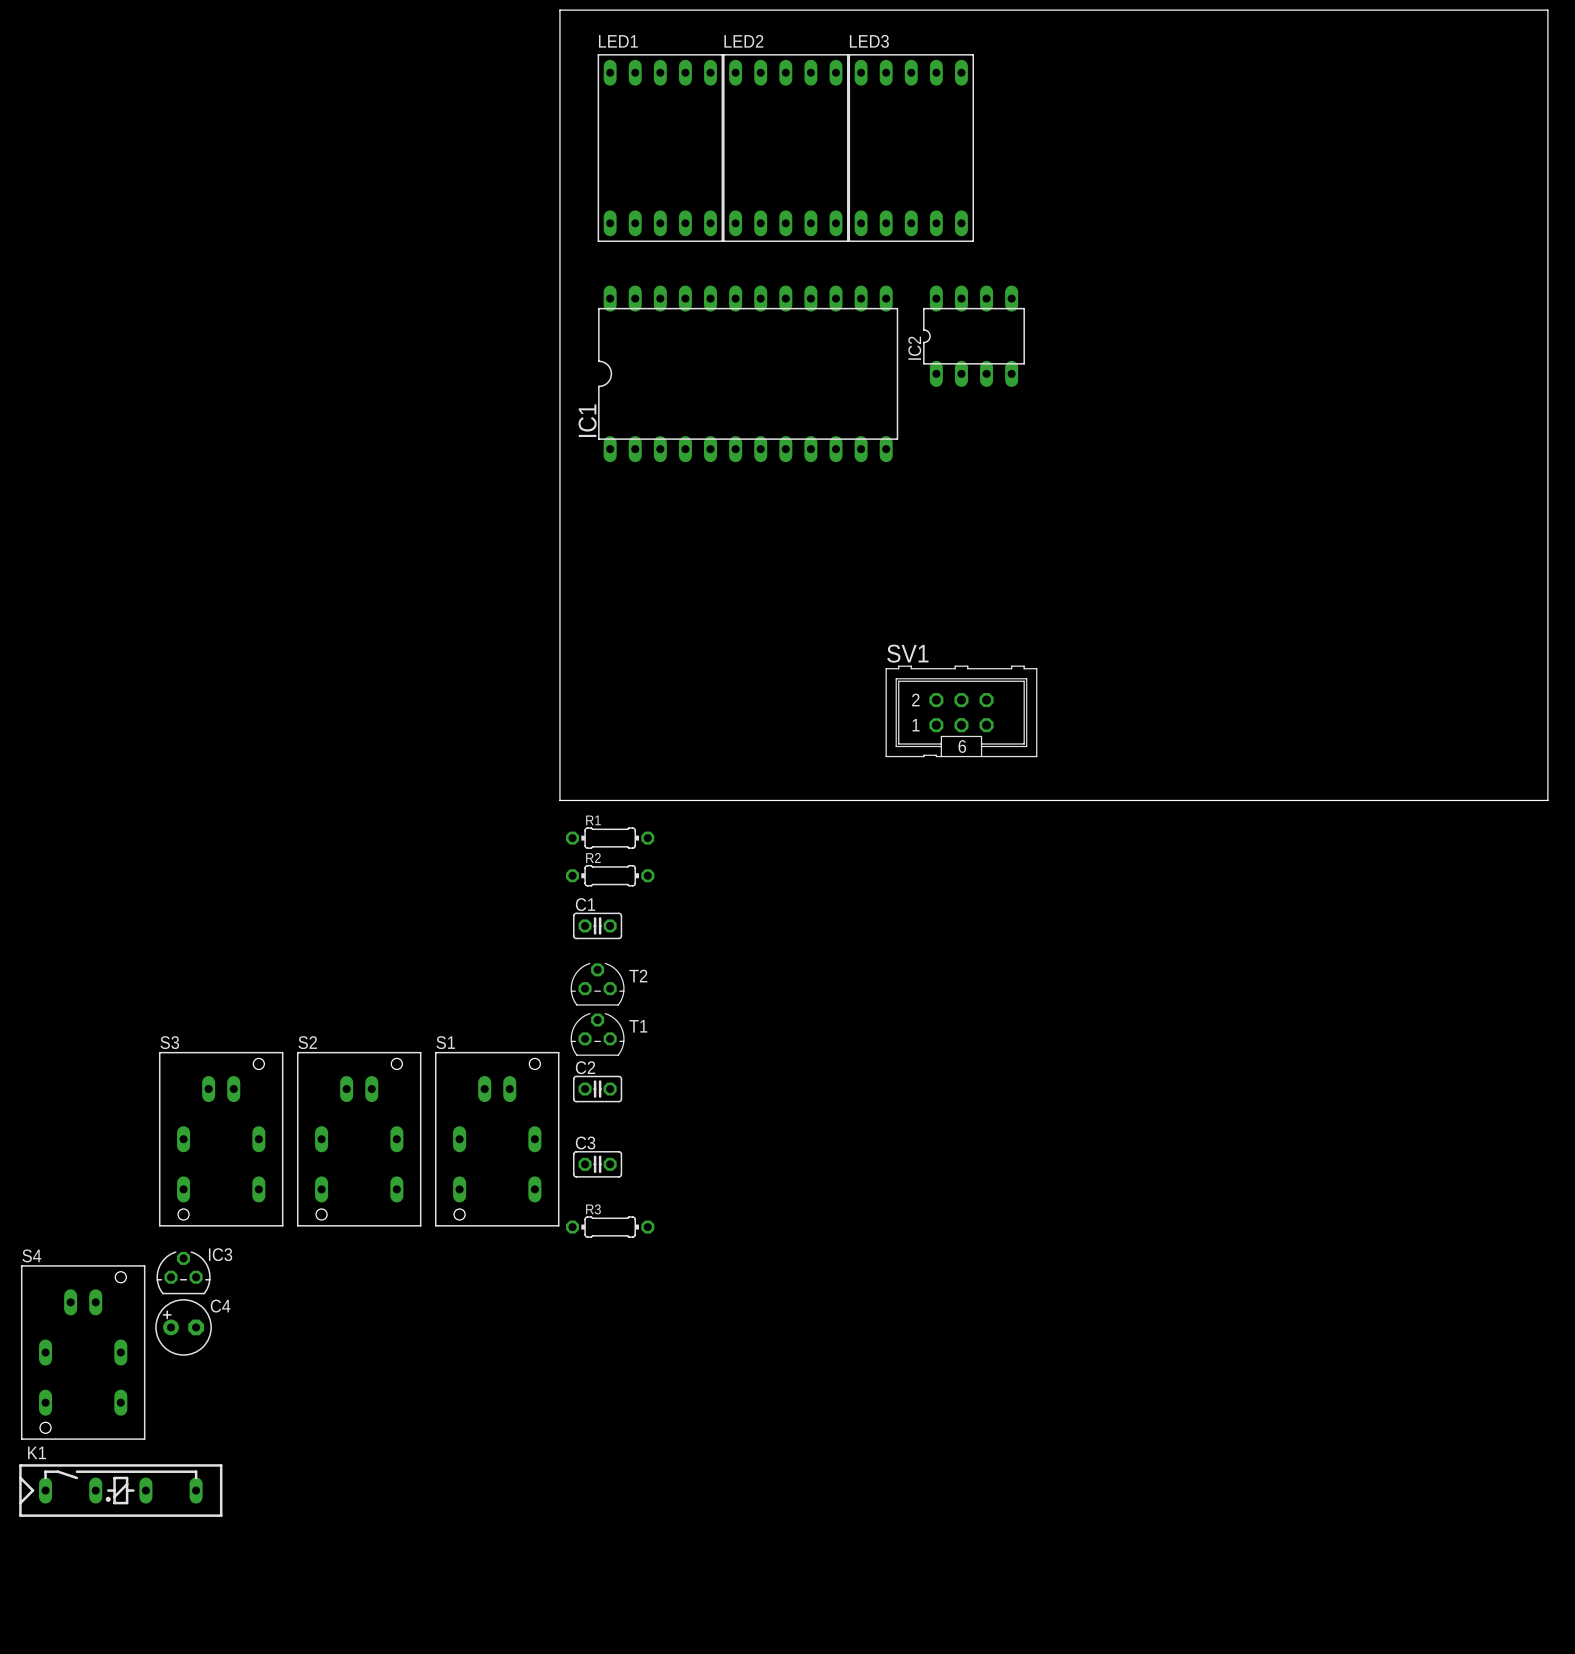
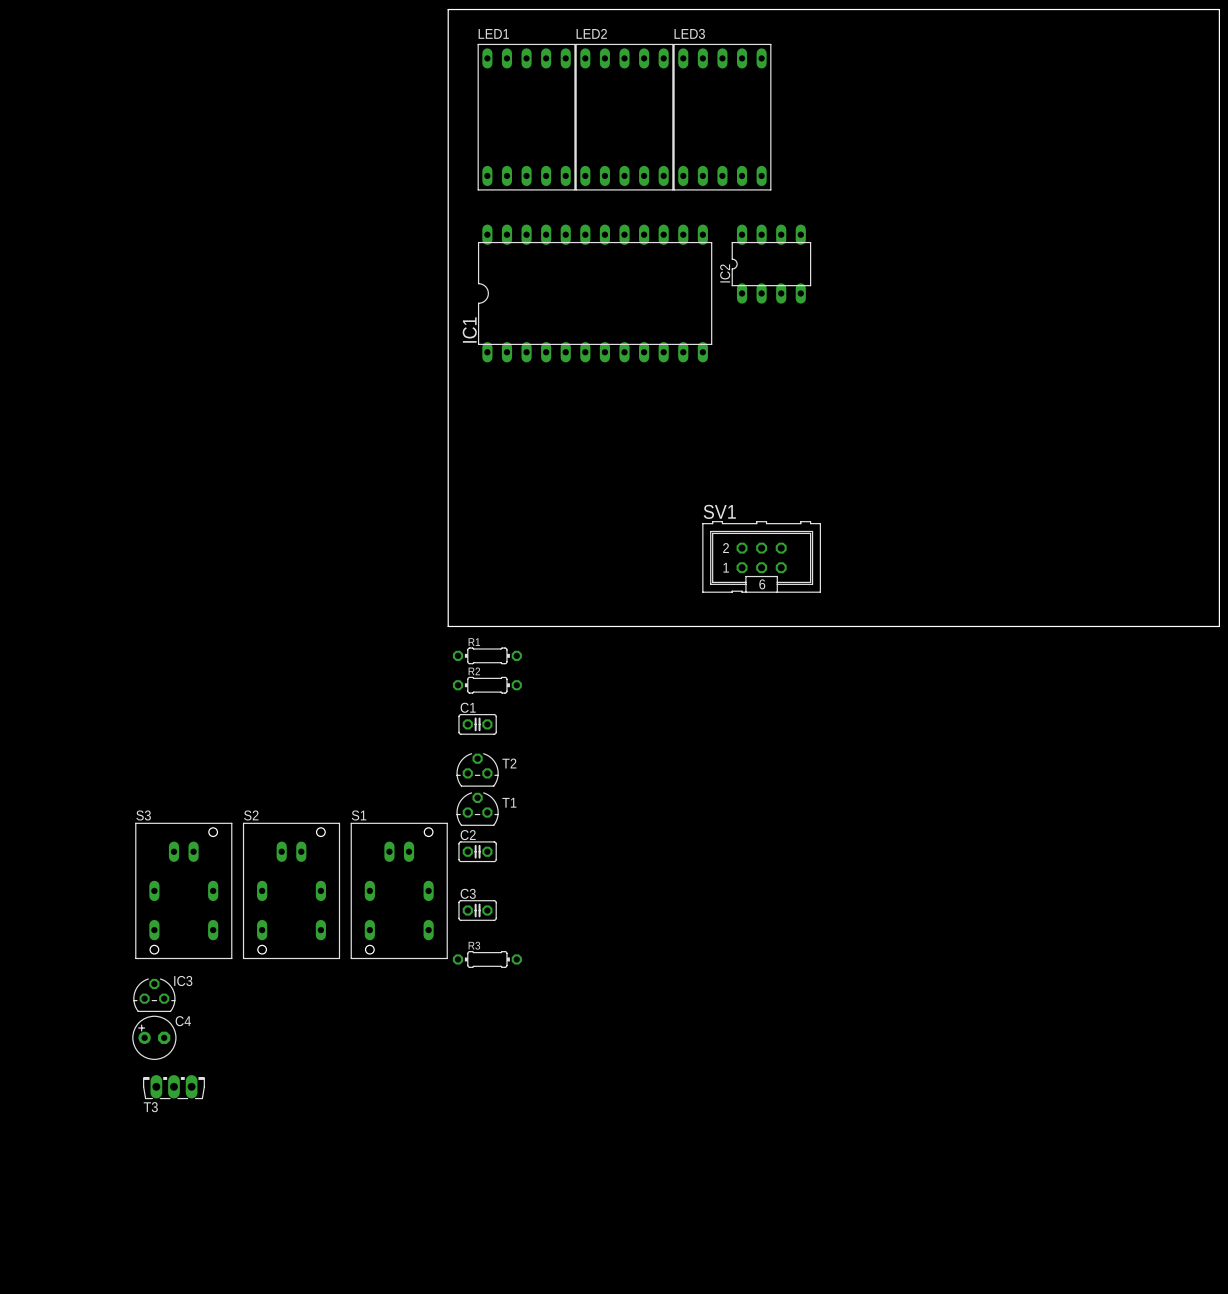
S4: (83, 1352) -> none
T3: none -> (173, 1087)
K1: (120, 1490) -> none

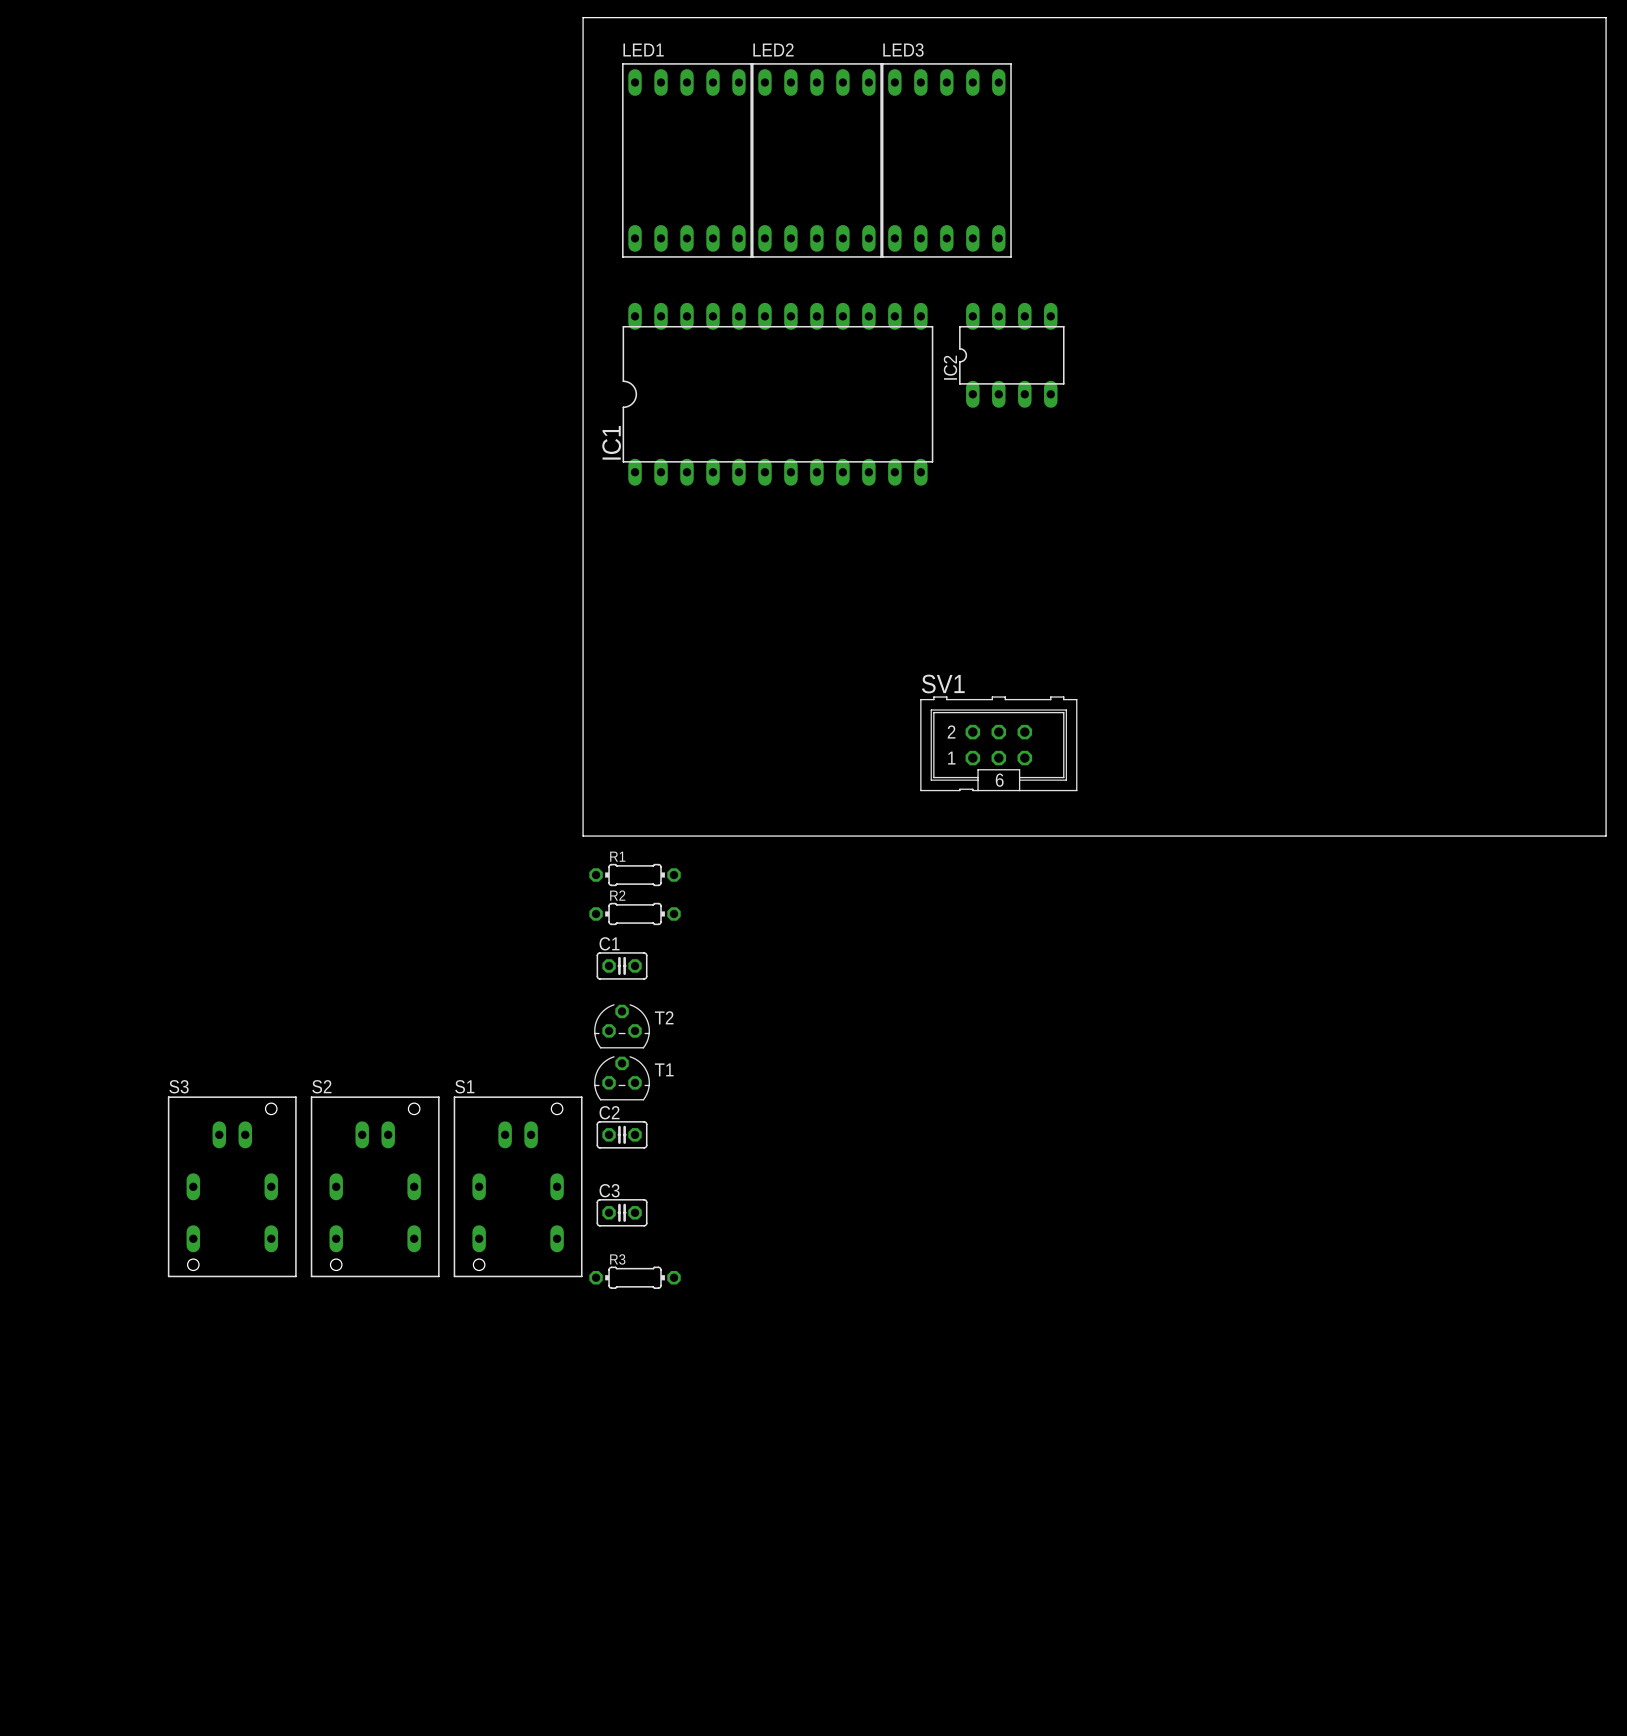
IC3: (154, 995) -> none
C4: (154, 1037) -> none
T3: (173, 1087) -> none

